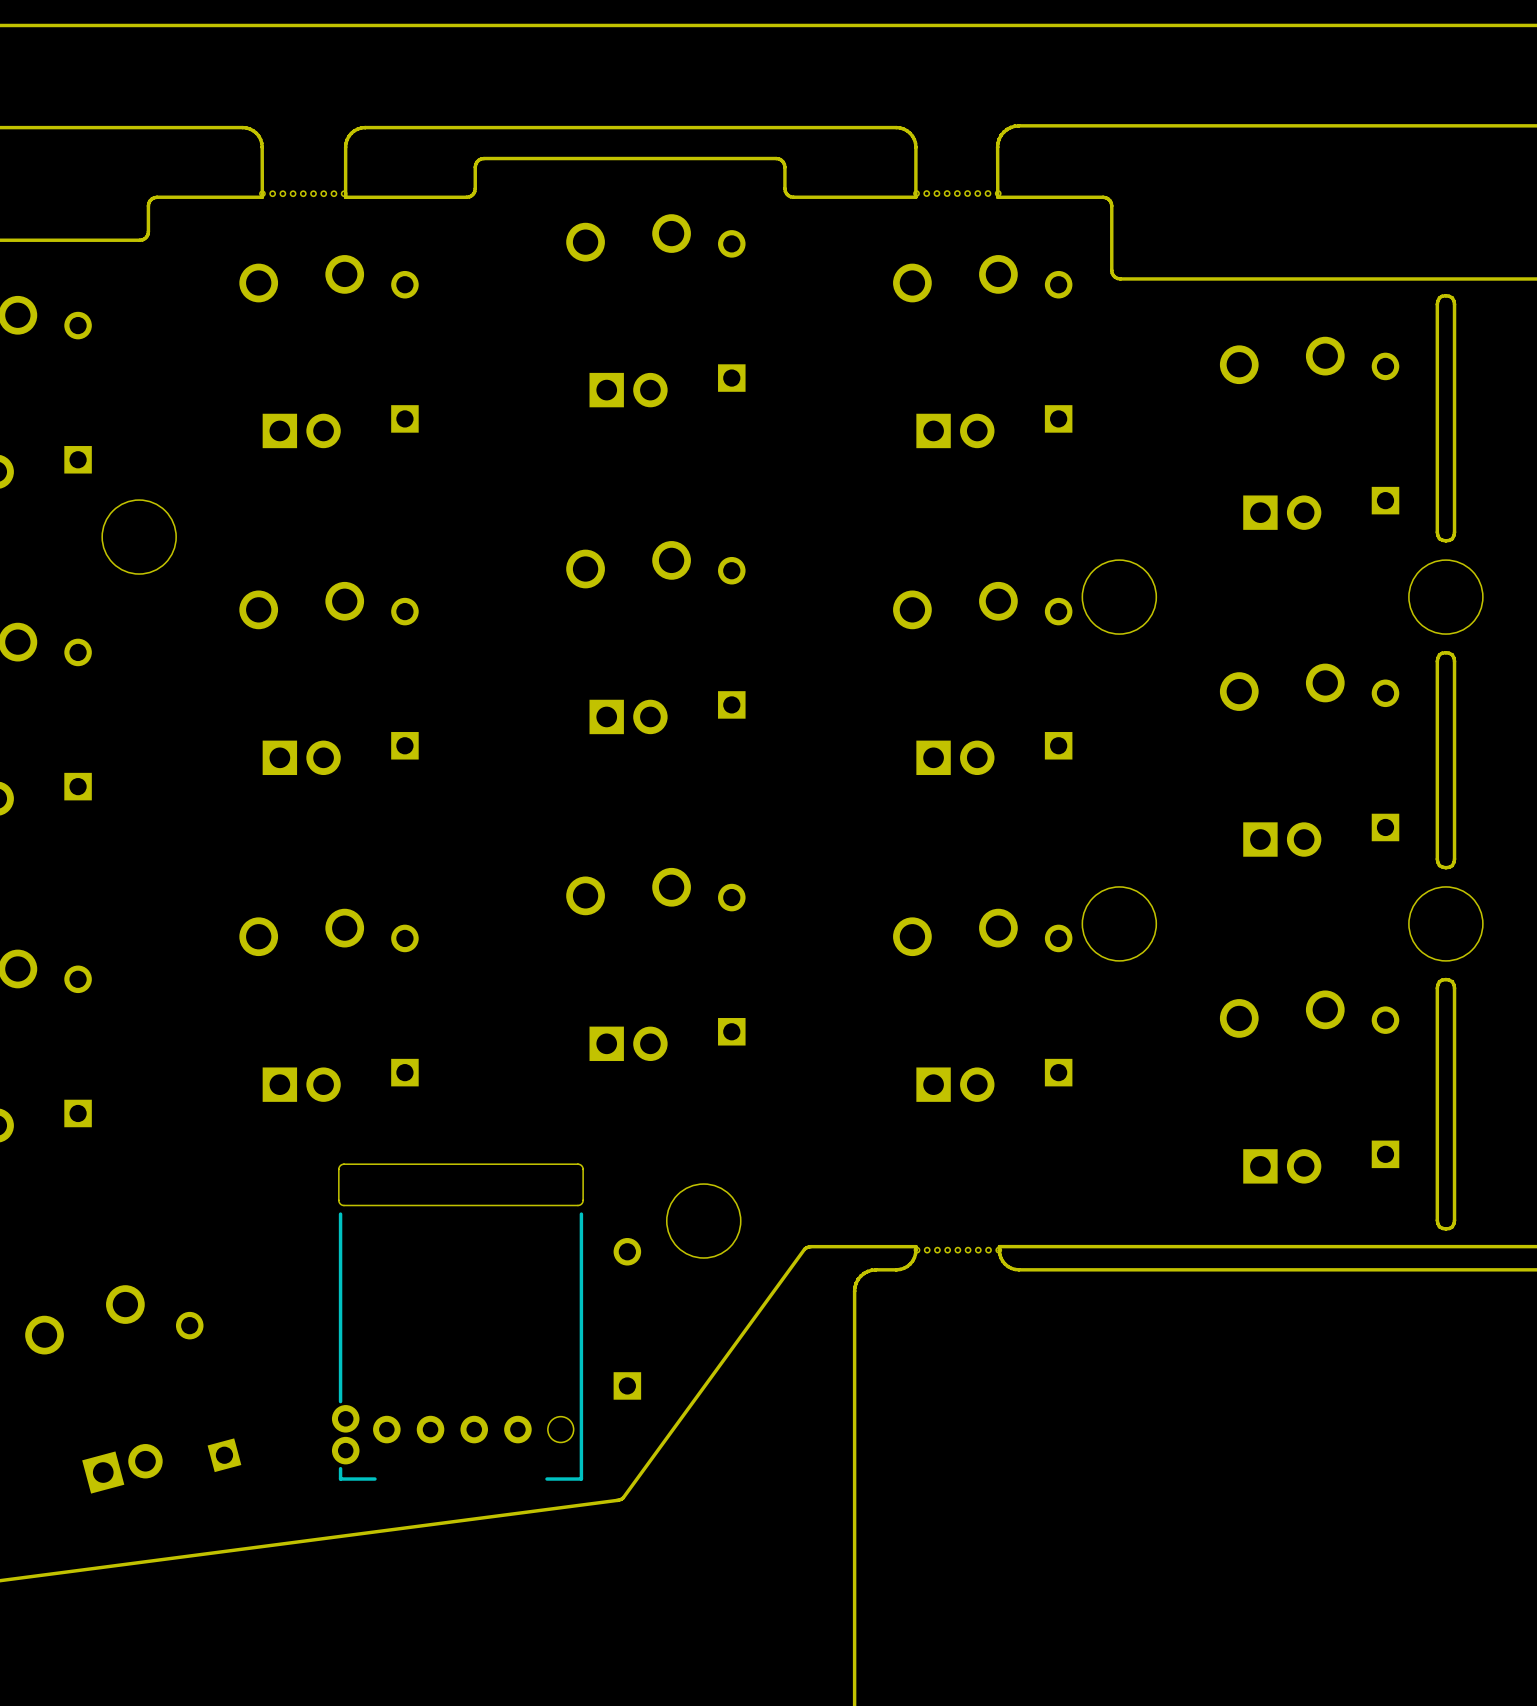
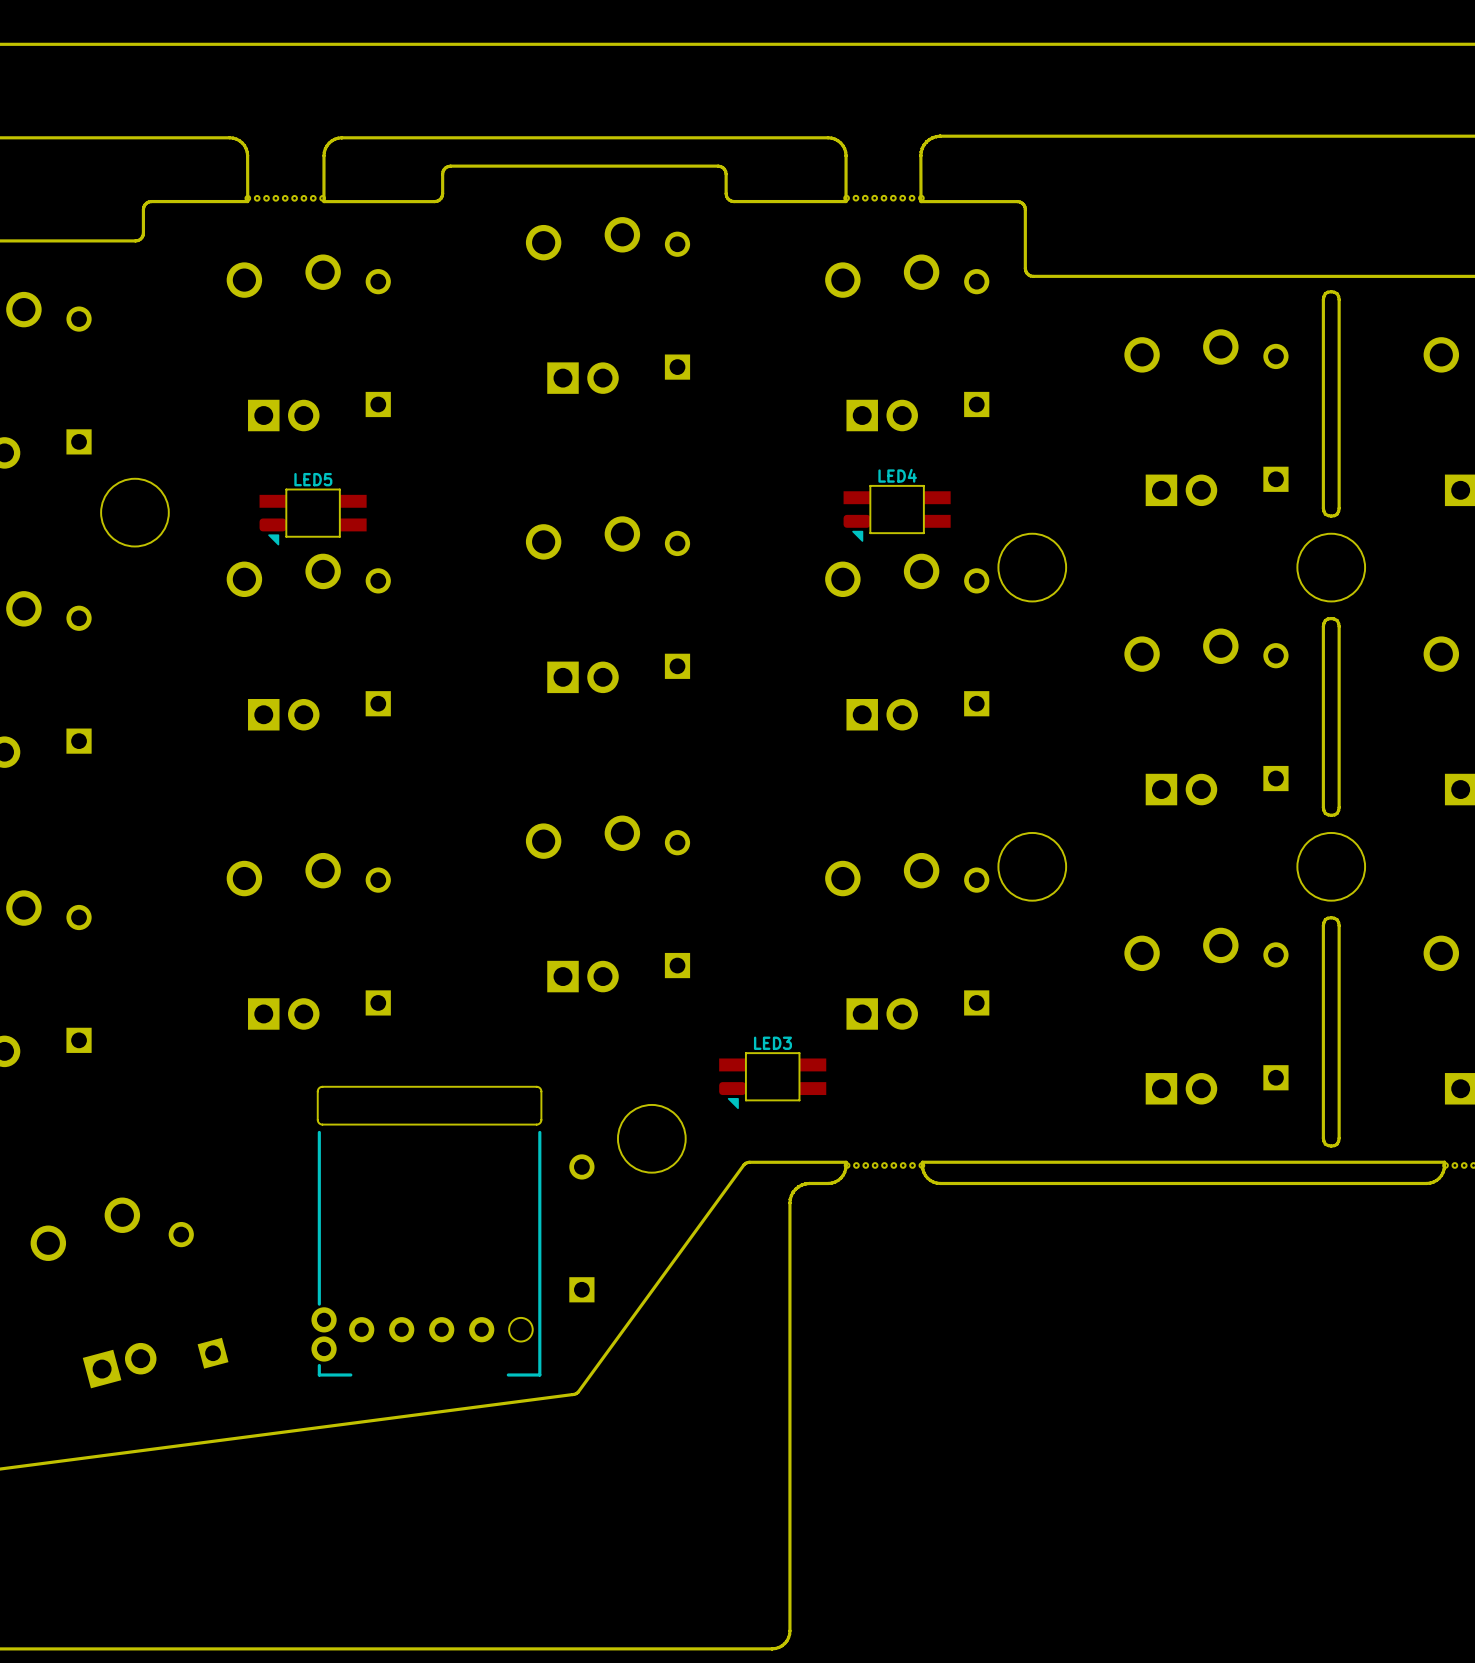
LED4: none -> (897, 513)
LED5: none -> (313, 516)
LED3: none -> (772, 1080)

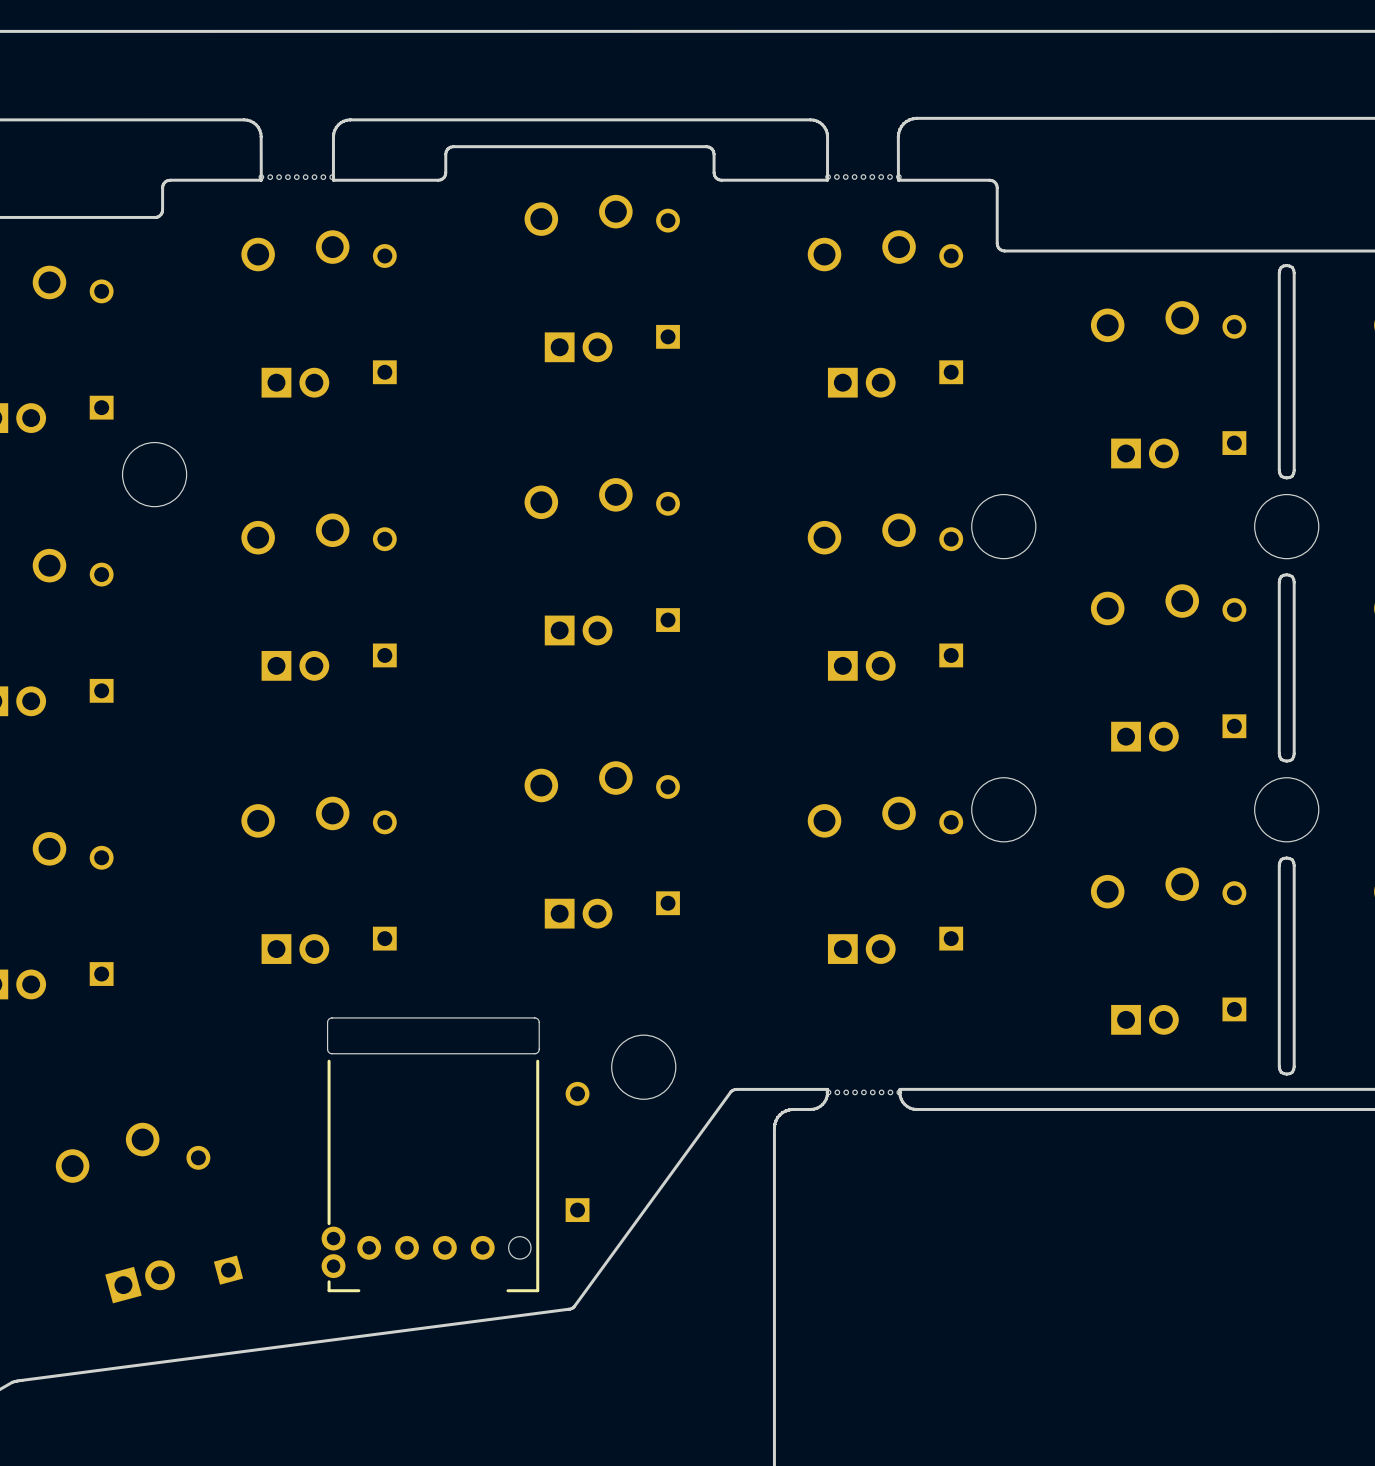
LED4: (897, 513) -> none
LED5: (313, 516) -> none
LED3: (772, 1080) -> none

